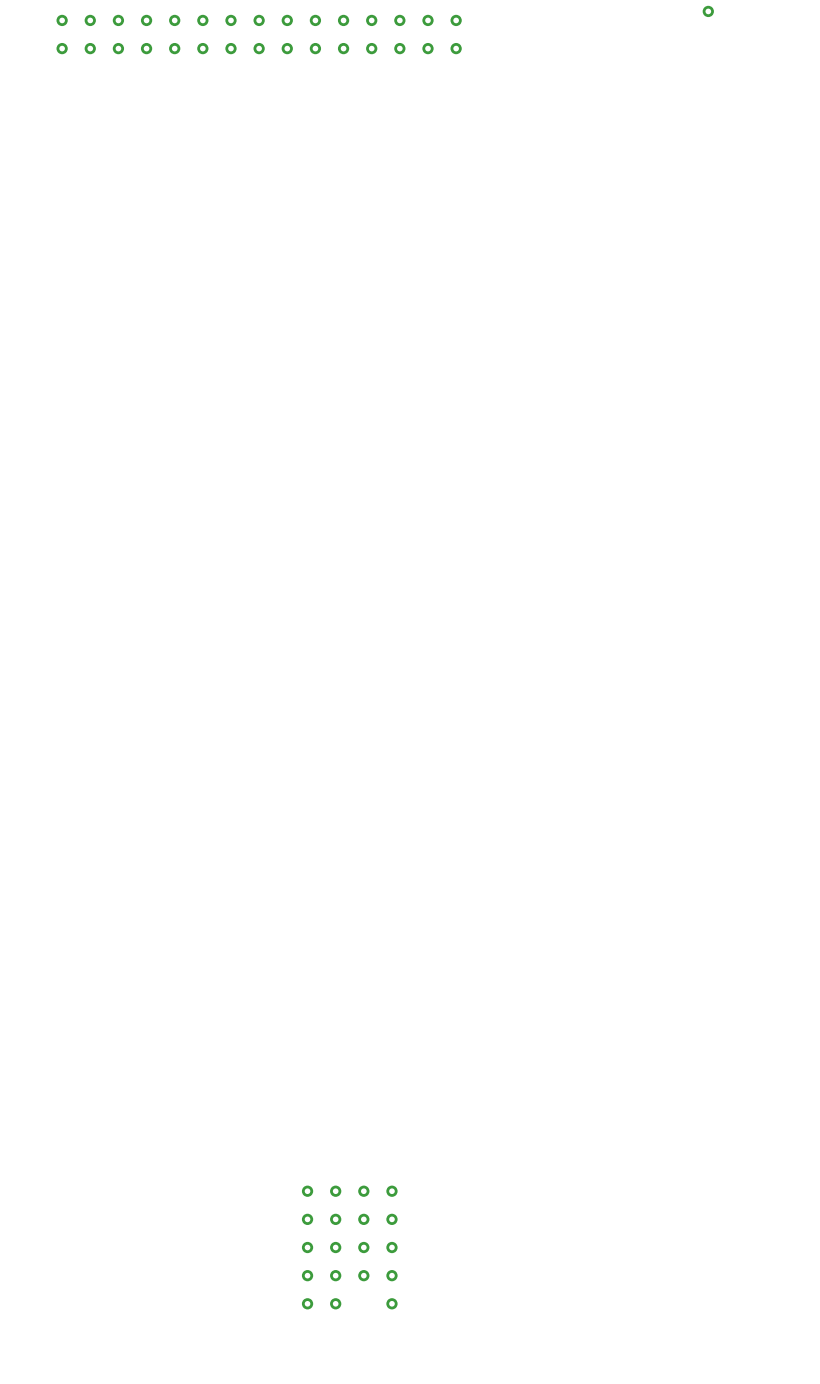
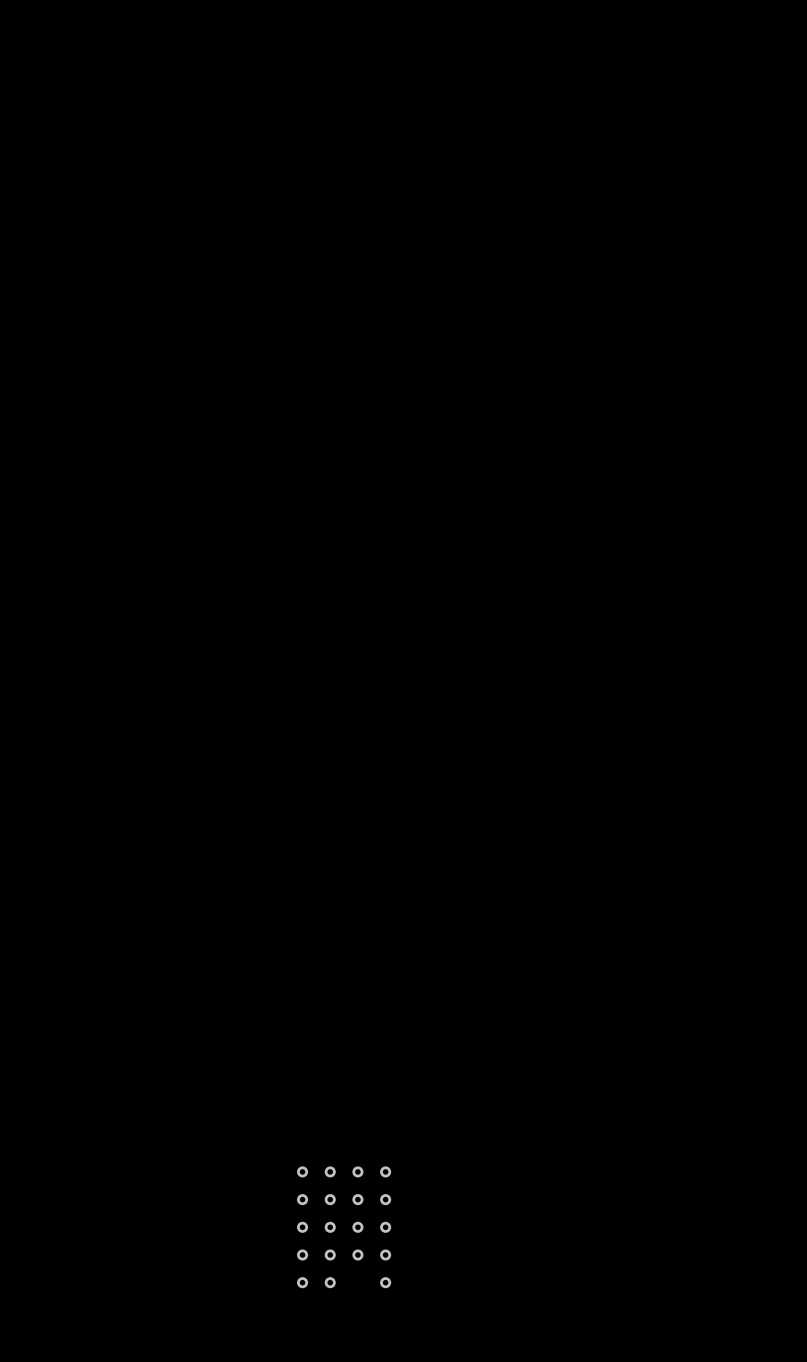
via: (708, 11) -> none
via: (62, 20) -> none
via: (90, 20) -> none
via: (118, 20) -> none
via: (146, 20) -> none
via: (174, 20) -> none
via: (202, 20) -> none
via: (230, 20) -> none
via: (259, 20) -> none
via: (287, 20) -> none
via: (315, 20) -> none
via: (343, 20) -> none
via: (371, 20) -> none
via: (399, 20) -> none
via: (427, 20) -> none
via: (456, 20) -> none
via: (62, 48) -> none
via: (90, 48) -> none
via: (118, 48) -> none
via: (146, 48) -> none
via: (174, 48) -> none
via: (202, 48) -> none
via: (230, 48) -> none
via: (259, 48) -> none
via: (287, 48) -> none
via: (315, 48) -> none
via: (343, 48) -> none
via: (371, 48) -> none
via: (399, 48) -> none
via: (427, 48) -> none
via: (456, 48) -> none

